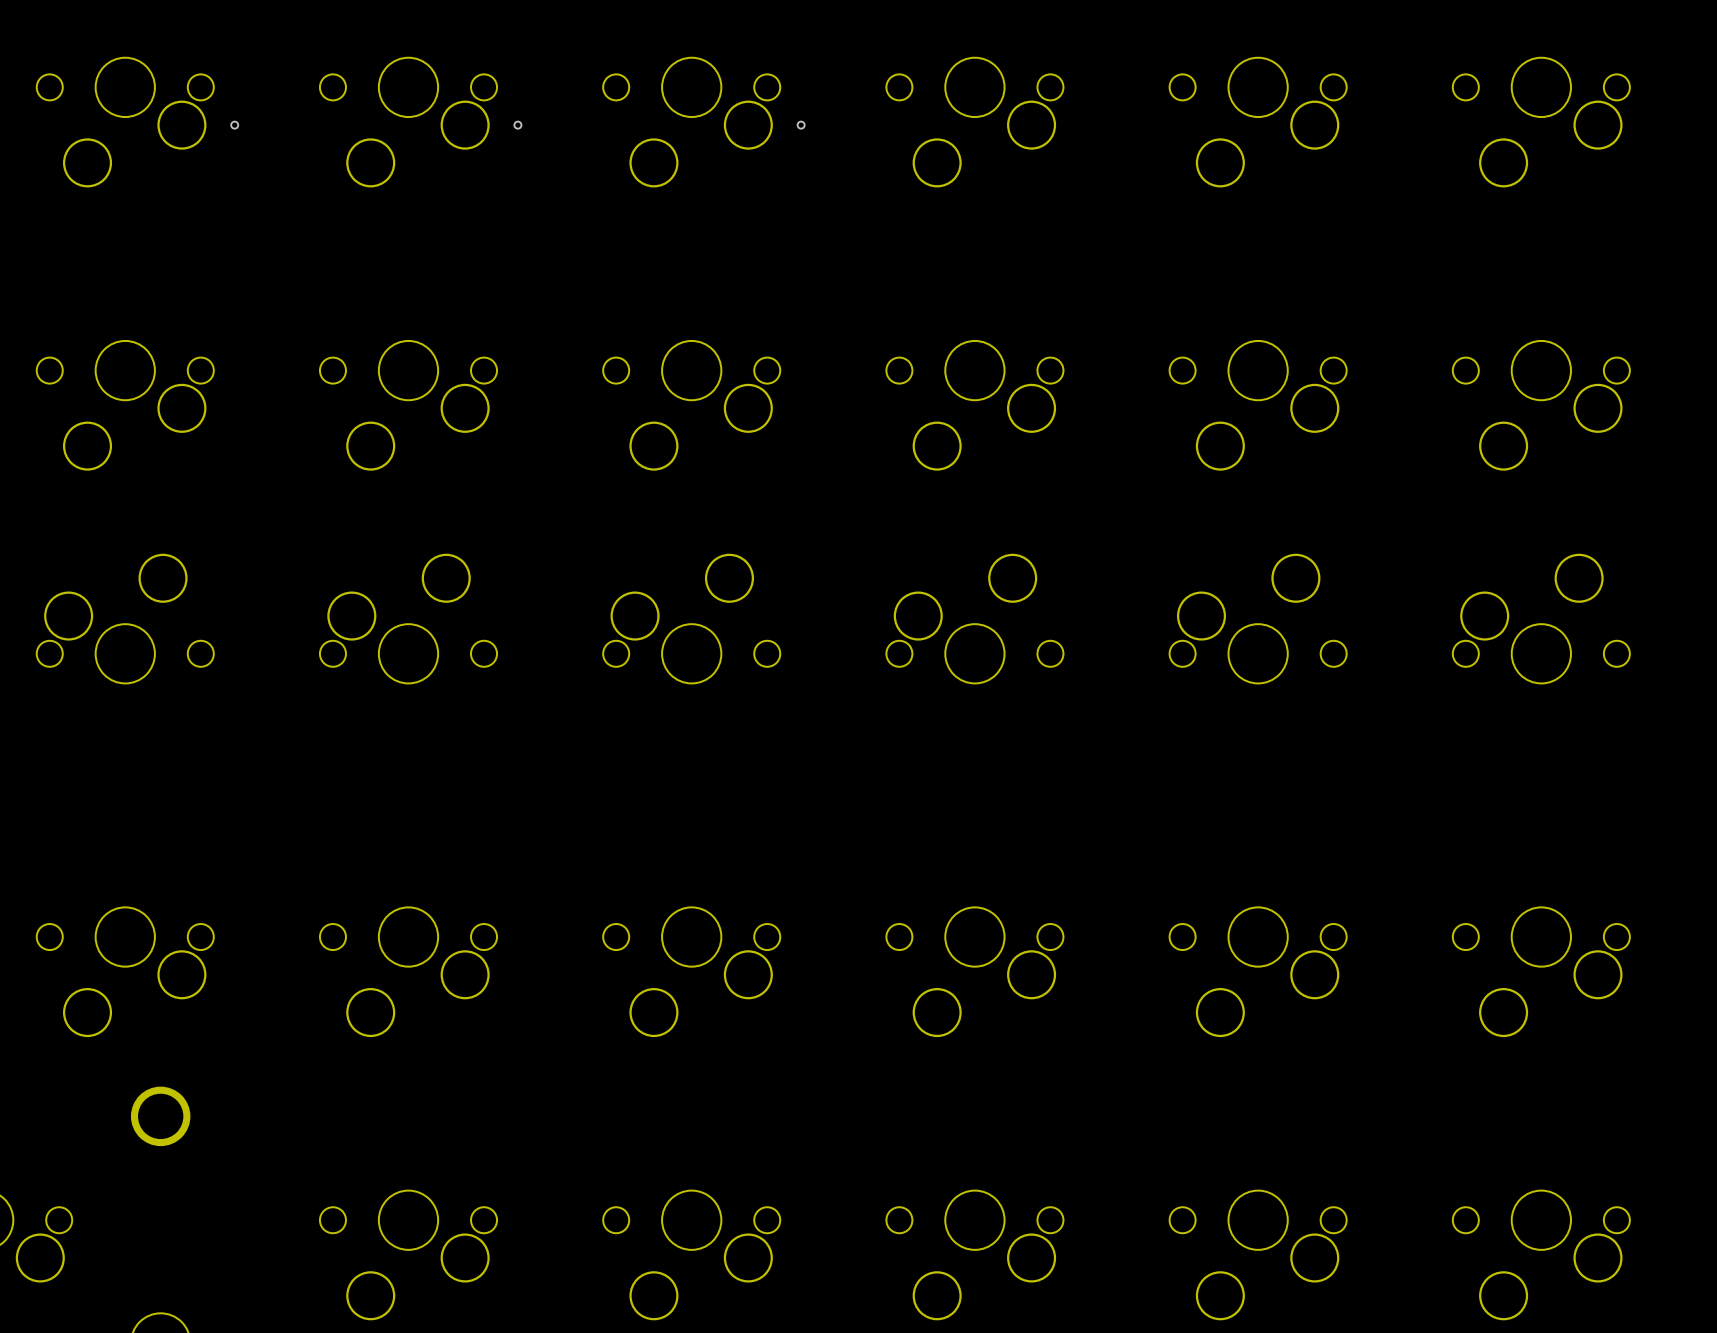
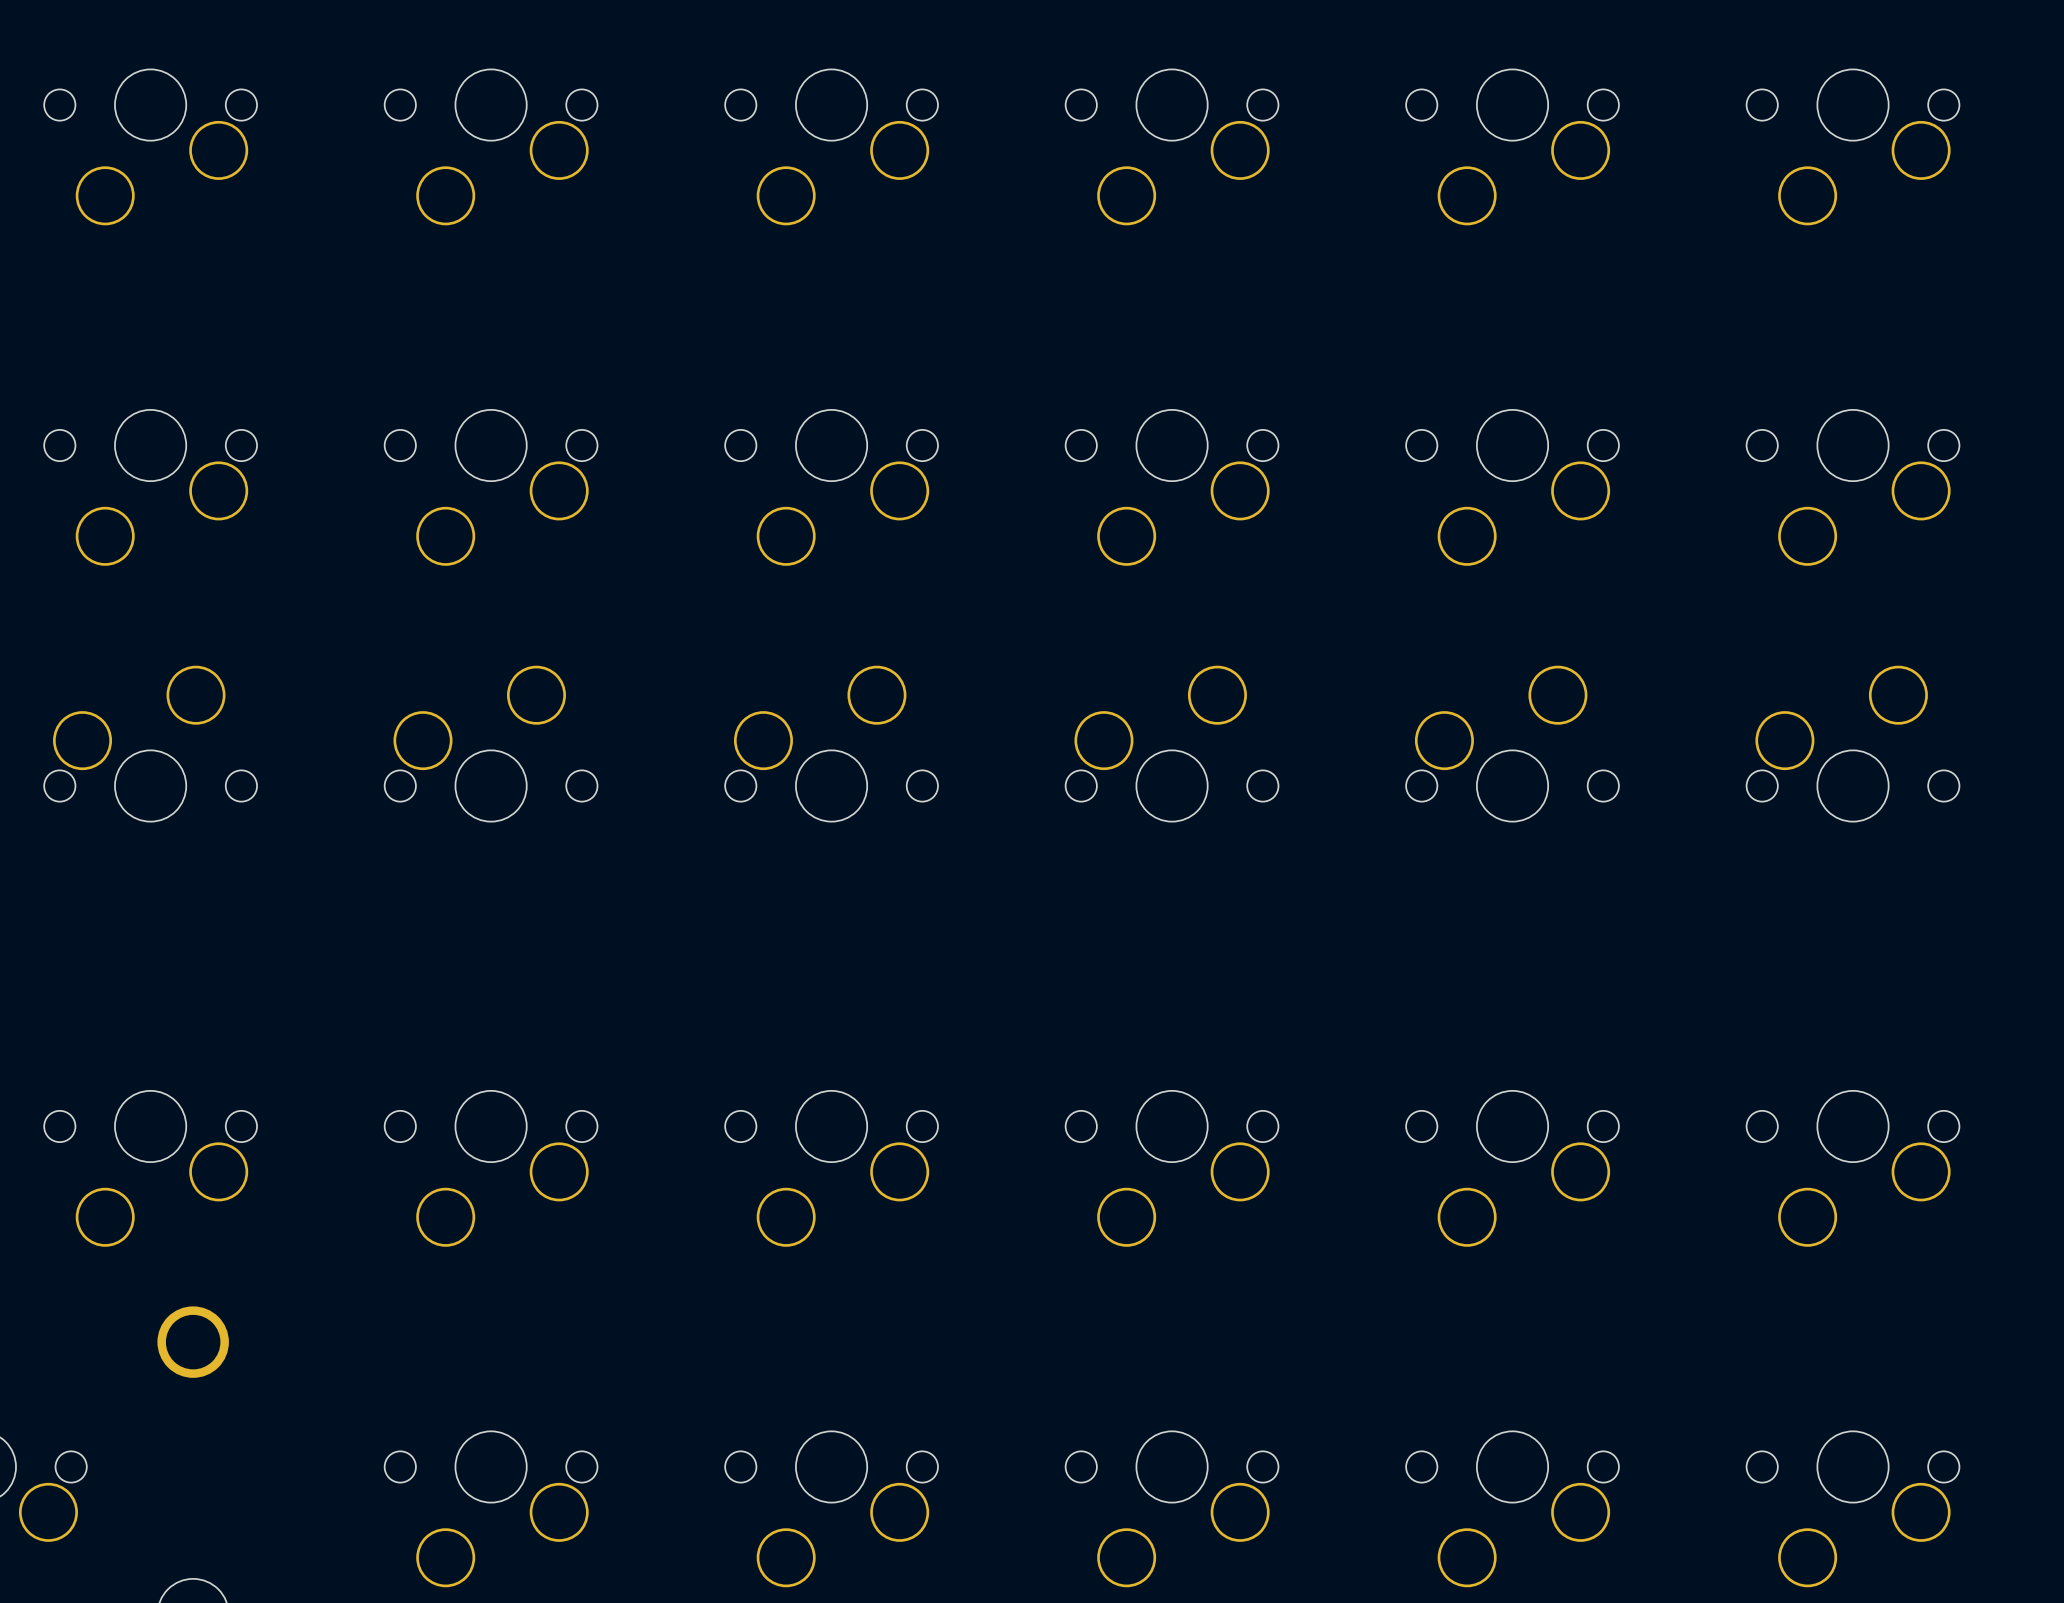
via: (234, 125) -> none
via: (517, 125) -> none
via: (801, 125) -> none

